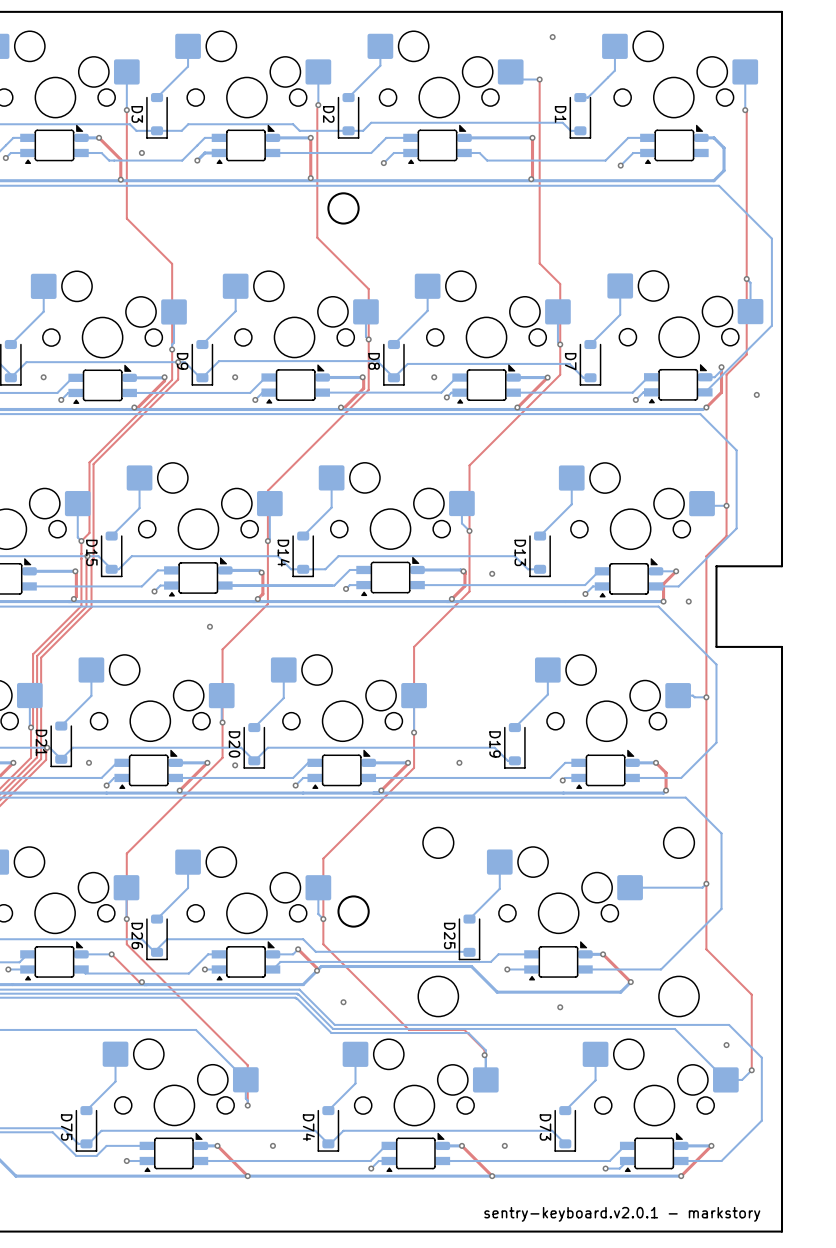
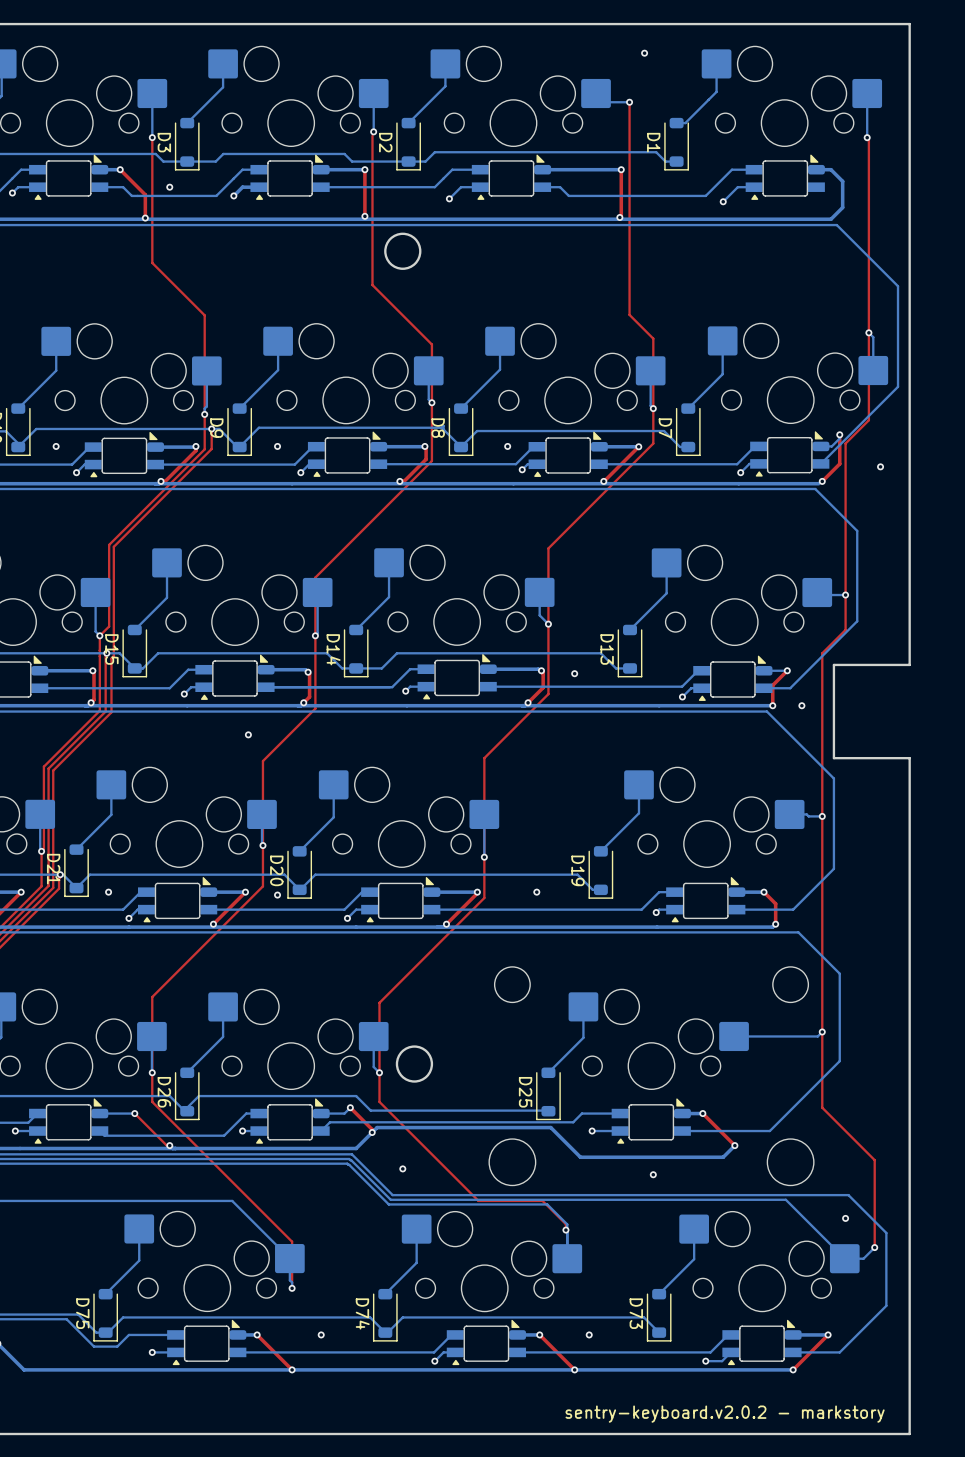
text: sentry-keyboard.v2.0.1 - markstory (622, 1214) -> sentry-keyboard.v2.0.2 - markstory (725, 1414)

